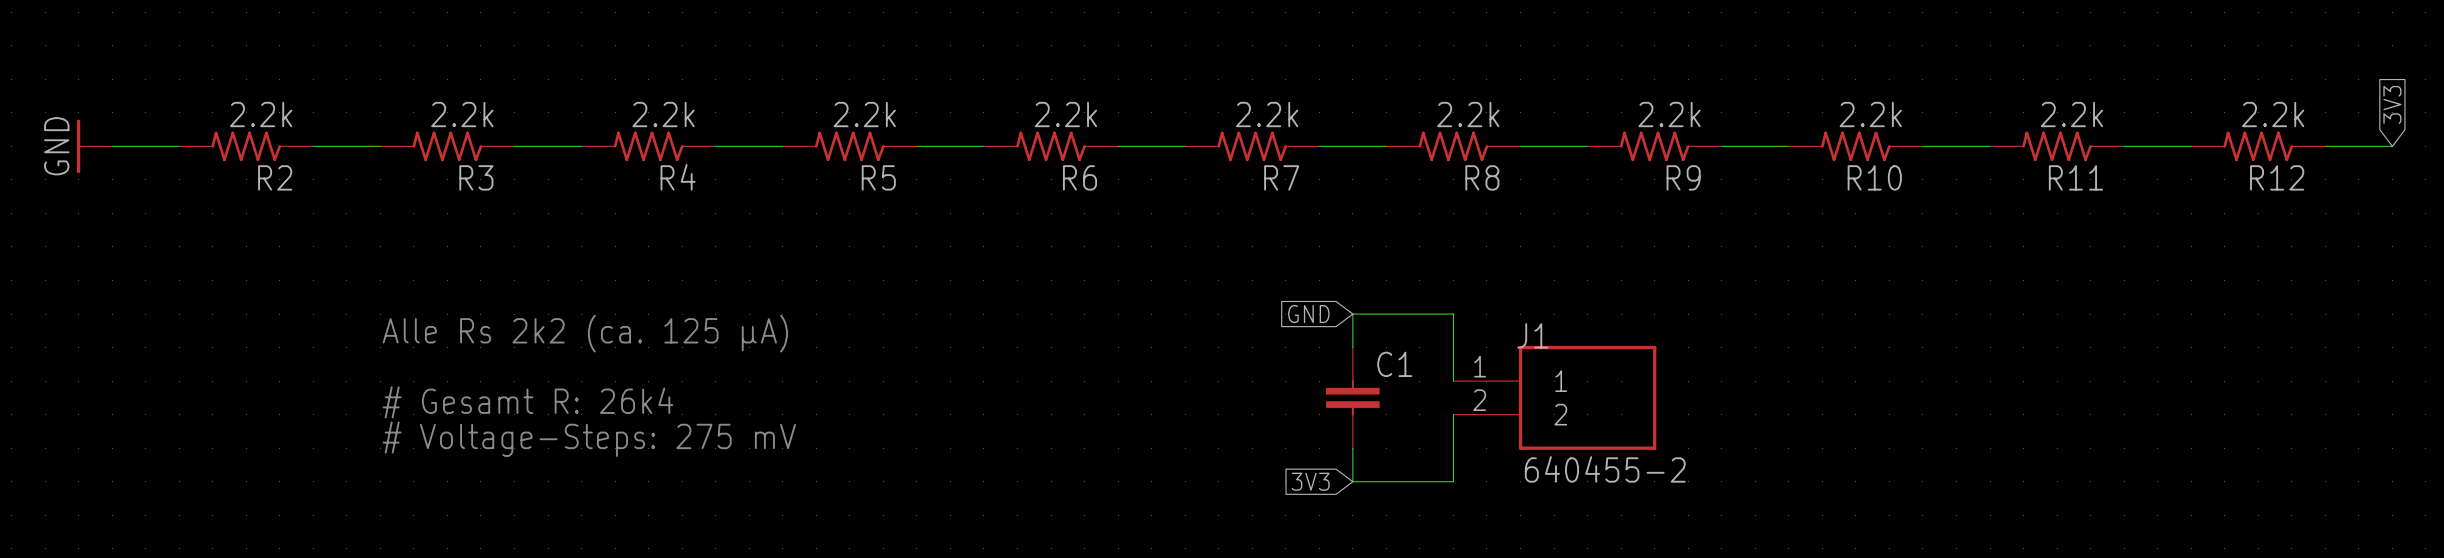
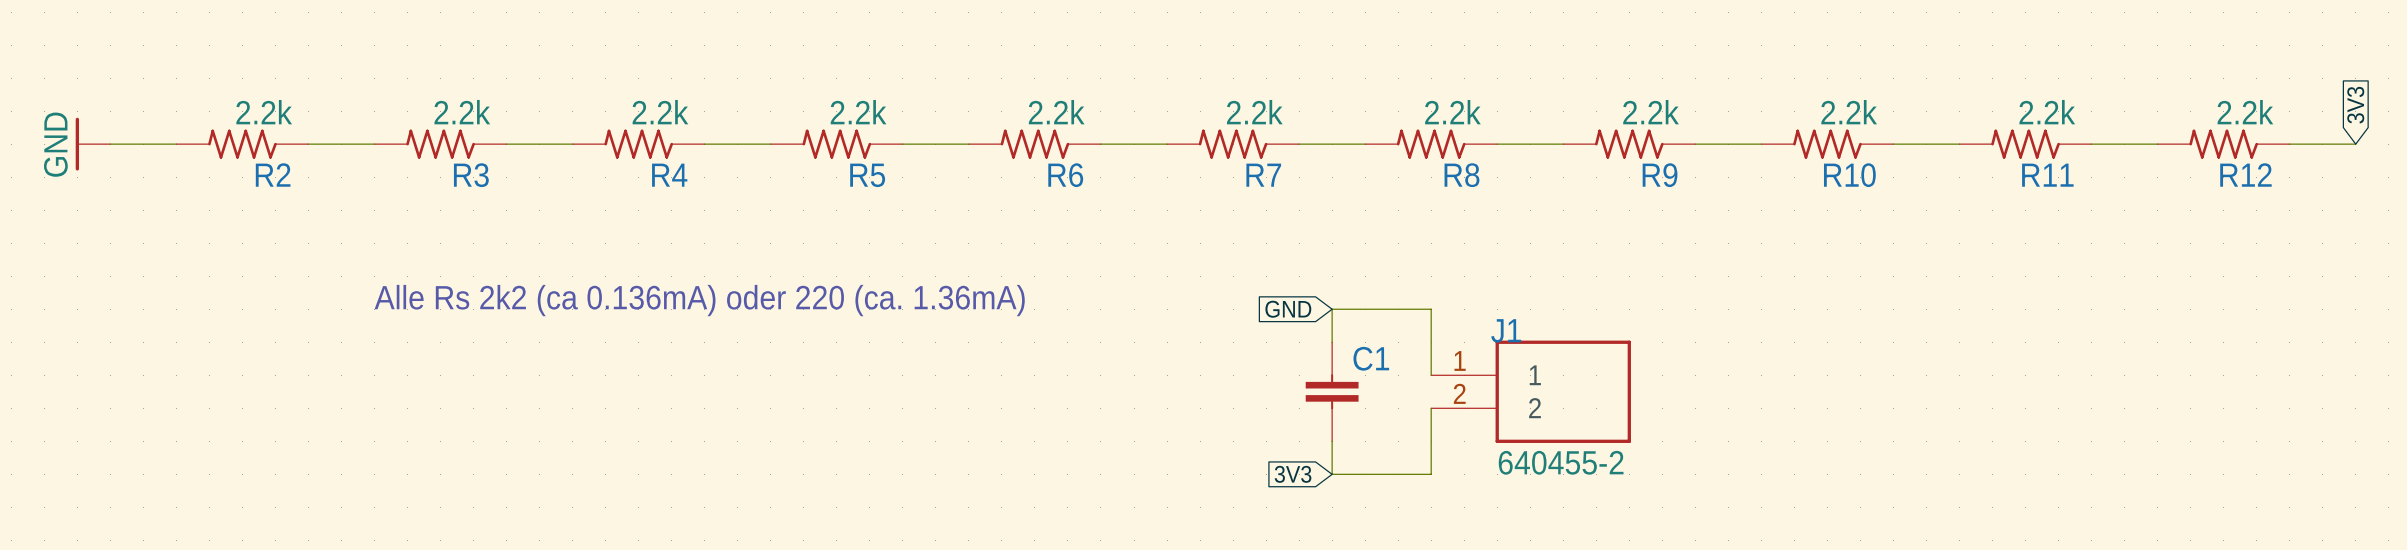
text: none -> Alle Rs 2k2 (ca 0.136mA) oder 220 (ca. 1.36mA) (699, 300)
text: Alle Rs 2k2 (ca. 125 µA) (585, 333) -> none
text: # Gesamt R: 26k4 (527, 402) -> none
text: # Voltage-Steps: 275 mV (589, 439) -> none

